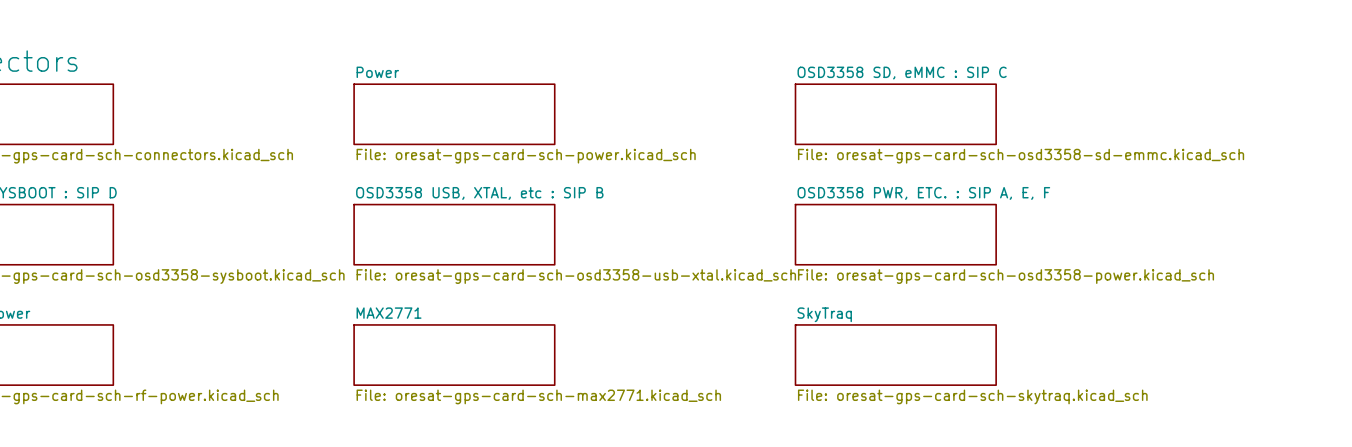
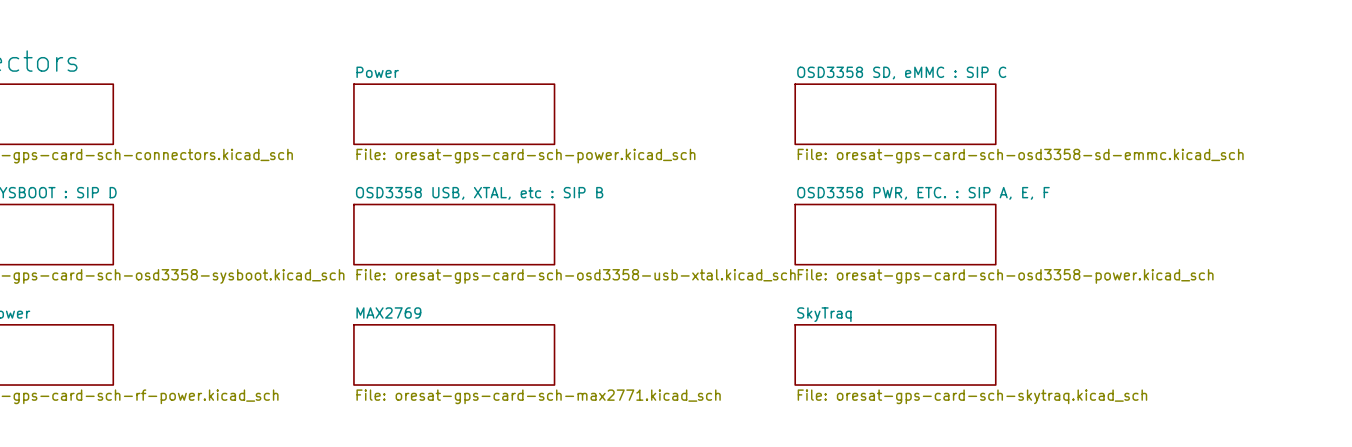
sheet MAX2771 name: MAX2771 (389, 313) -> MAX2769 (388, 312)

